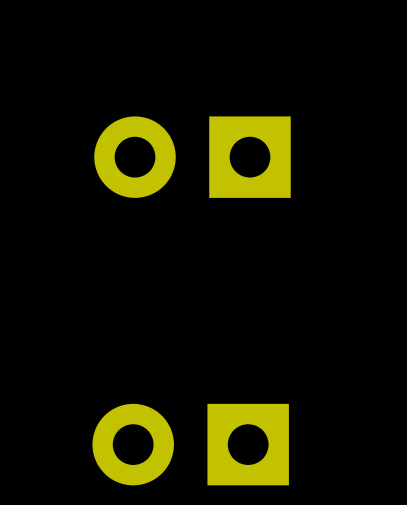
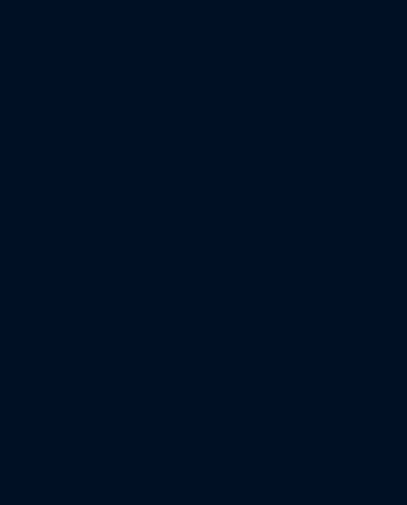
part: (192, 157) -> none
part: (190, 444) -> none

